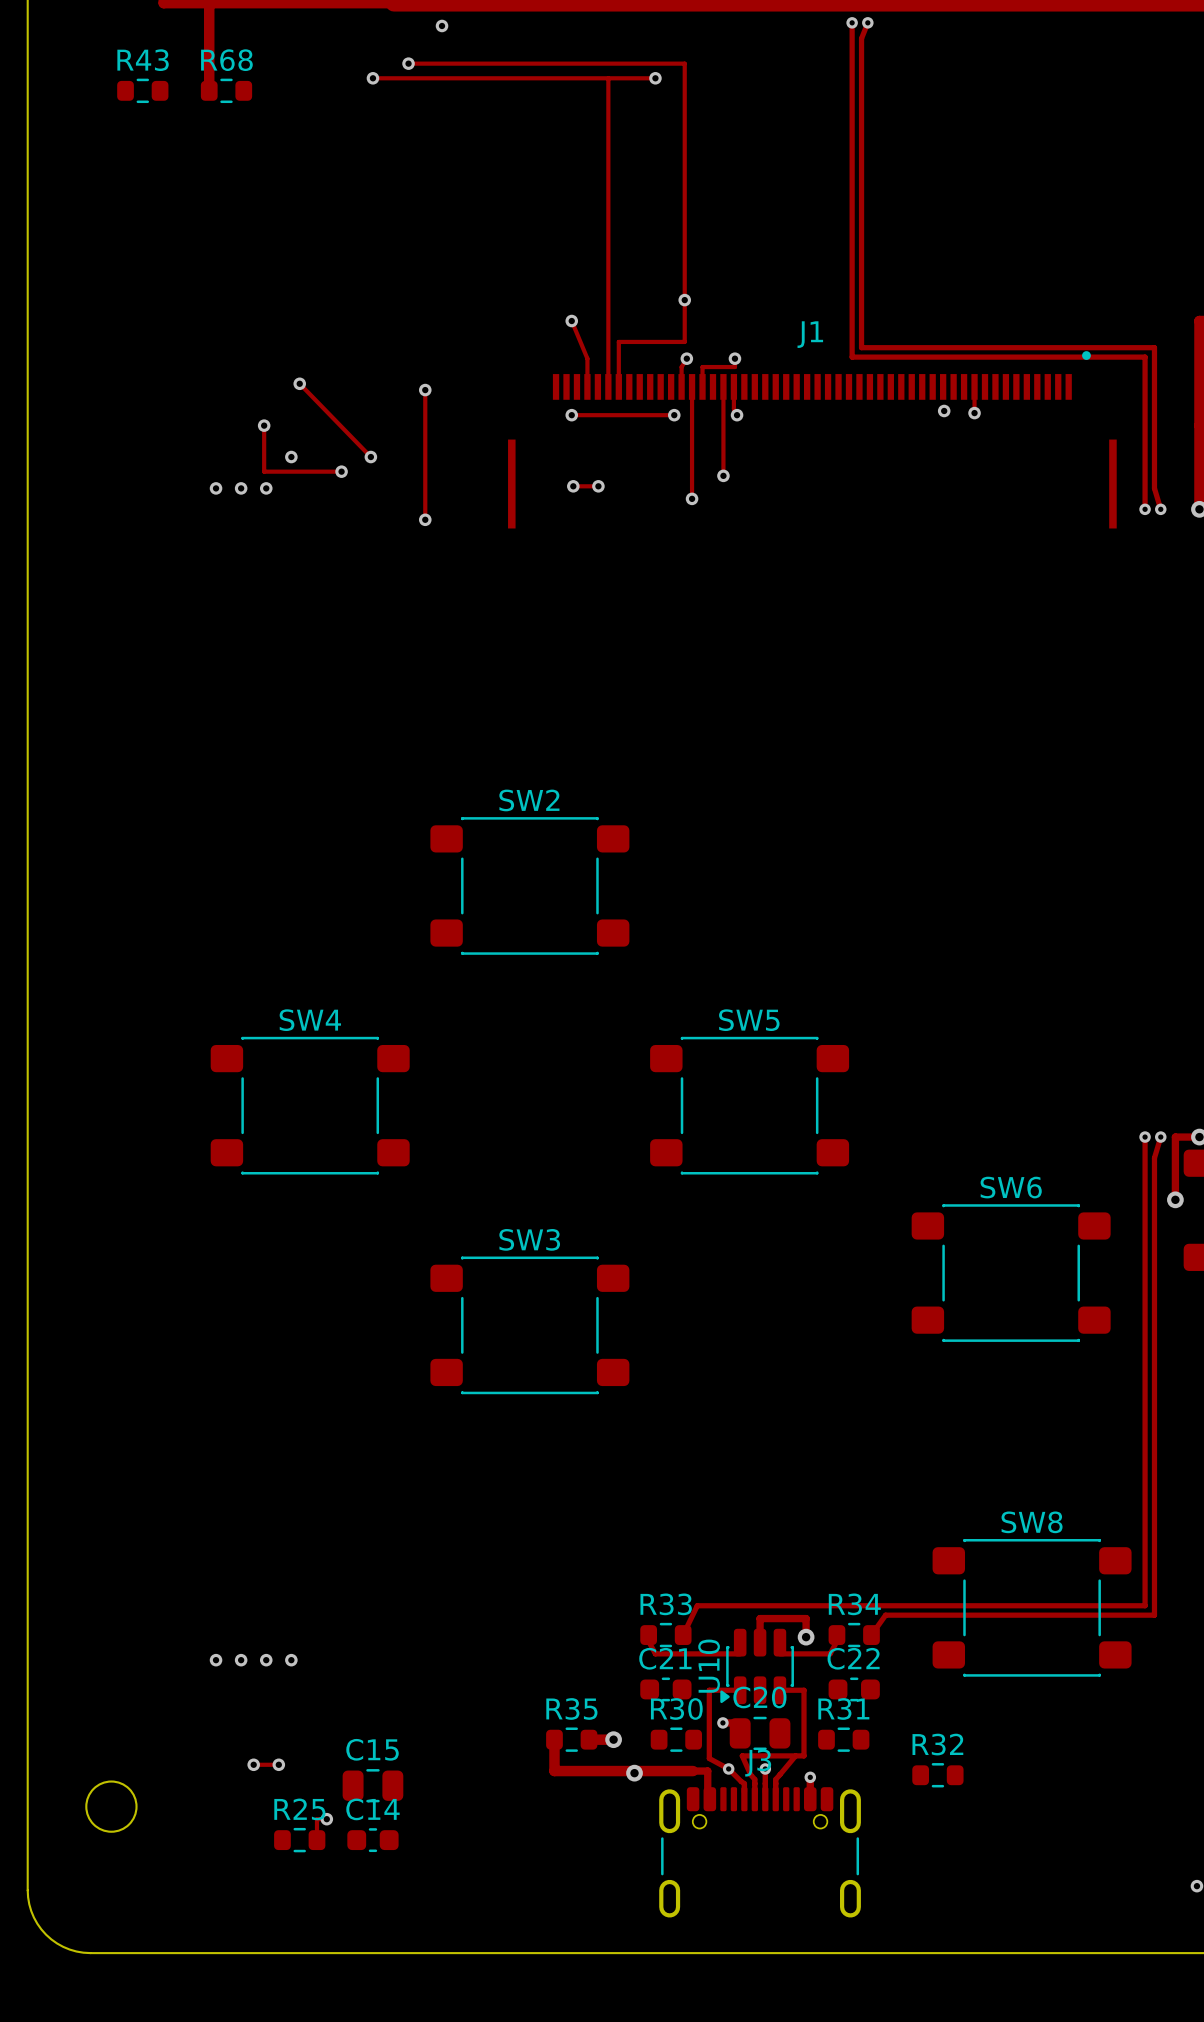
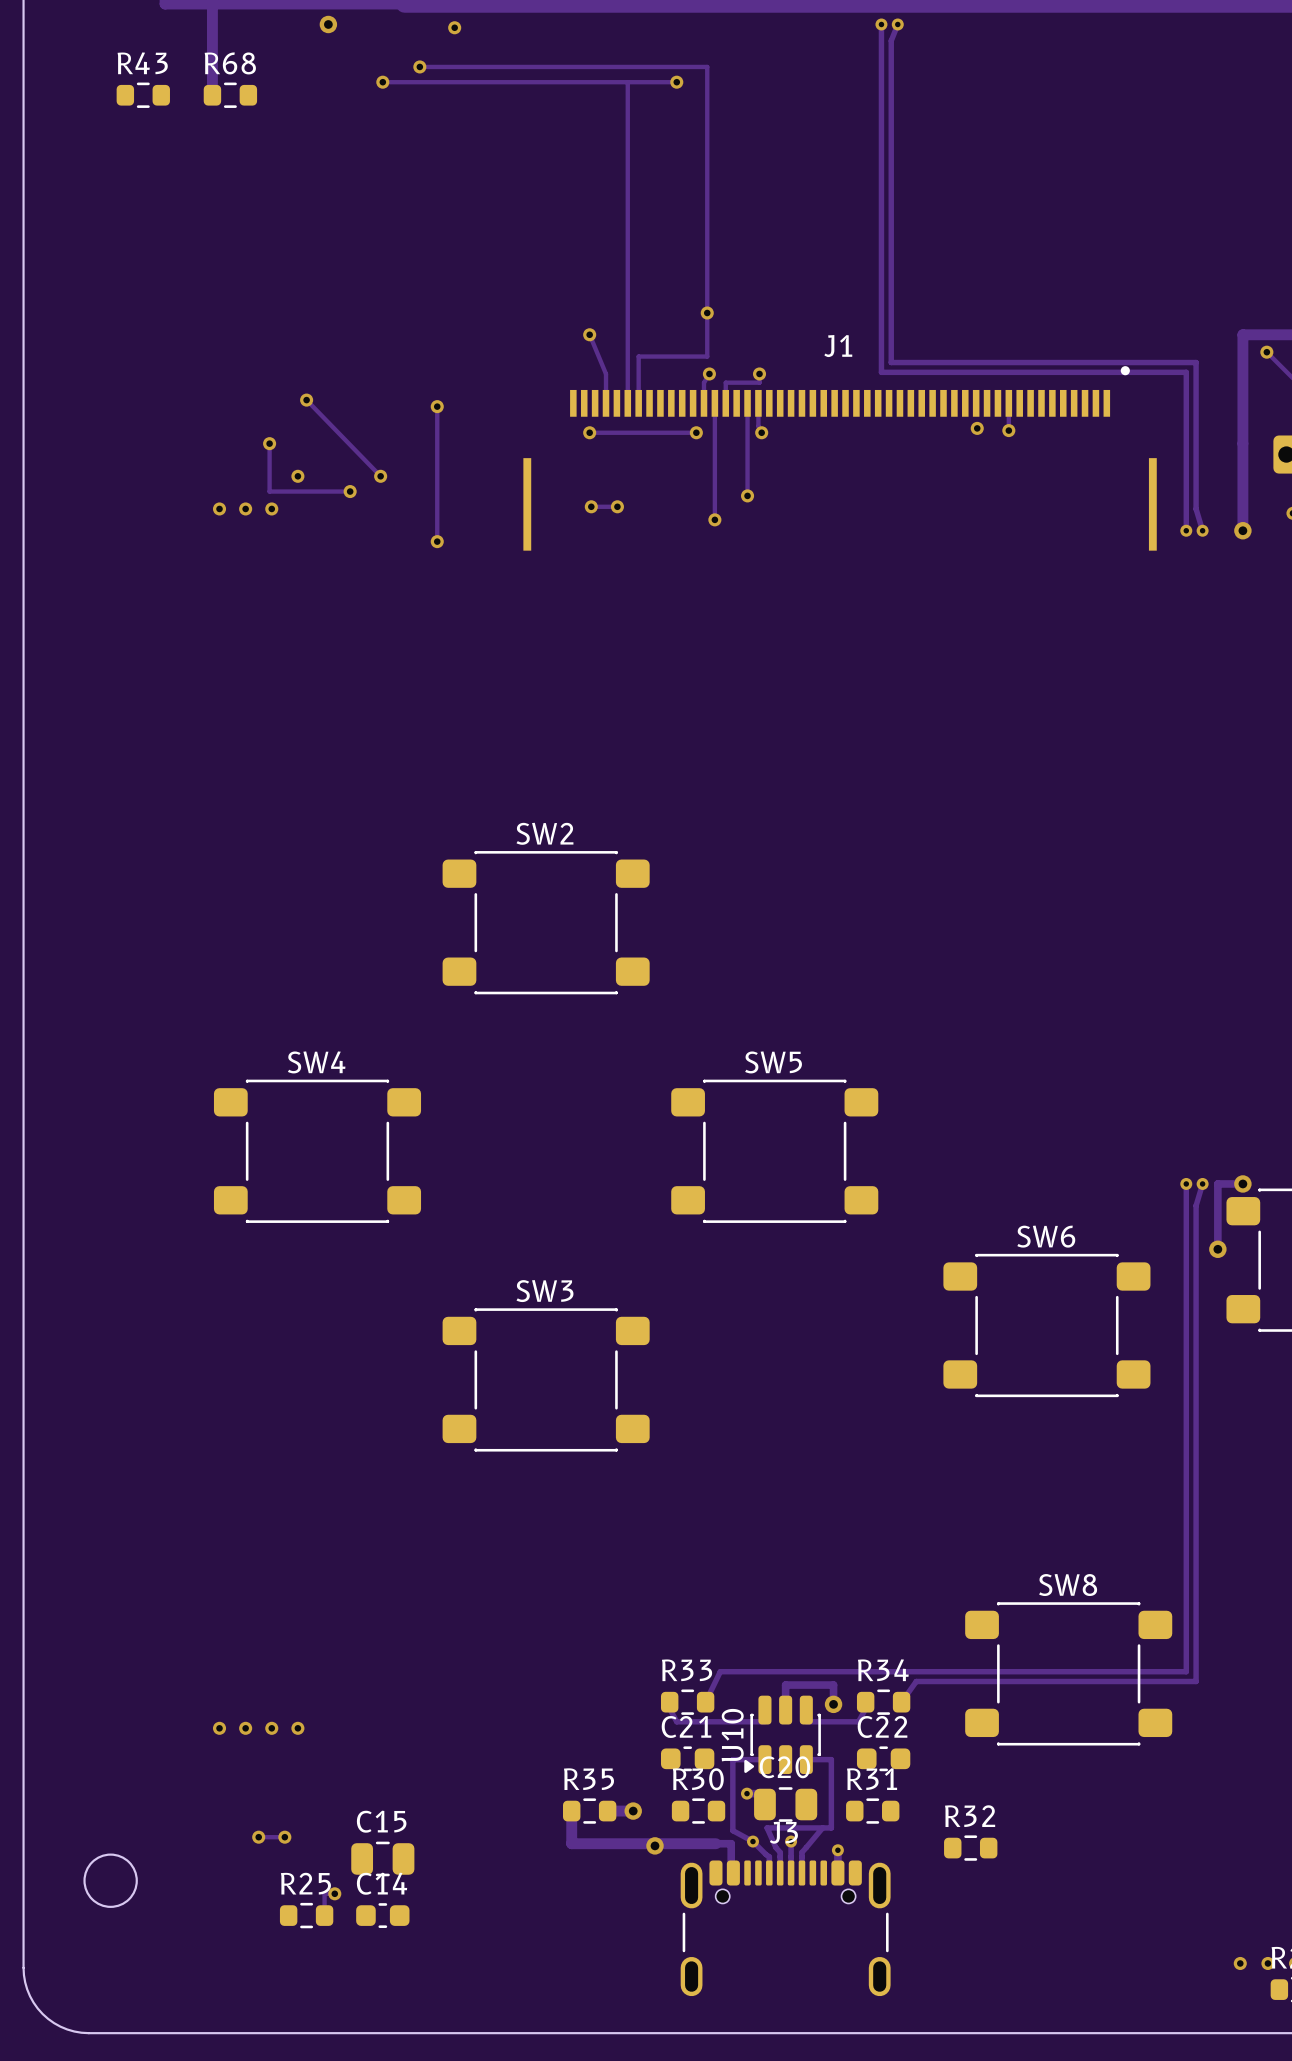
via: none -> (328, 24)

